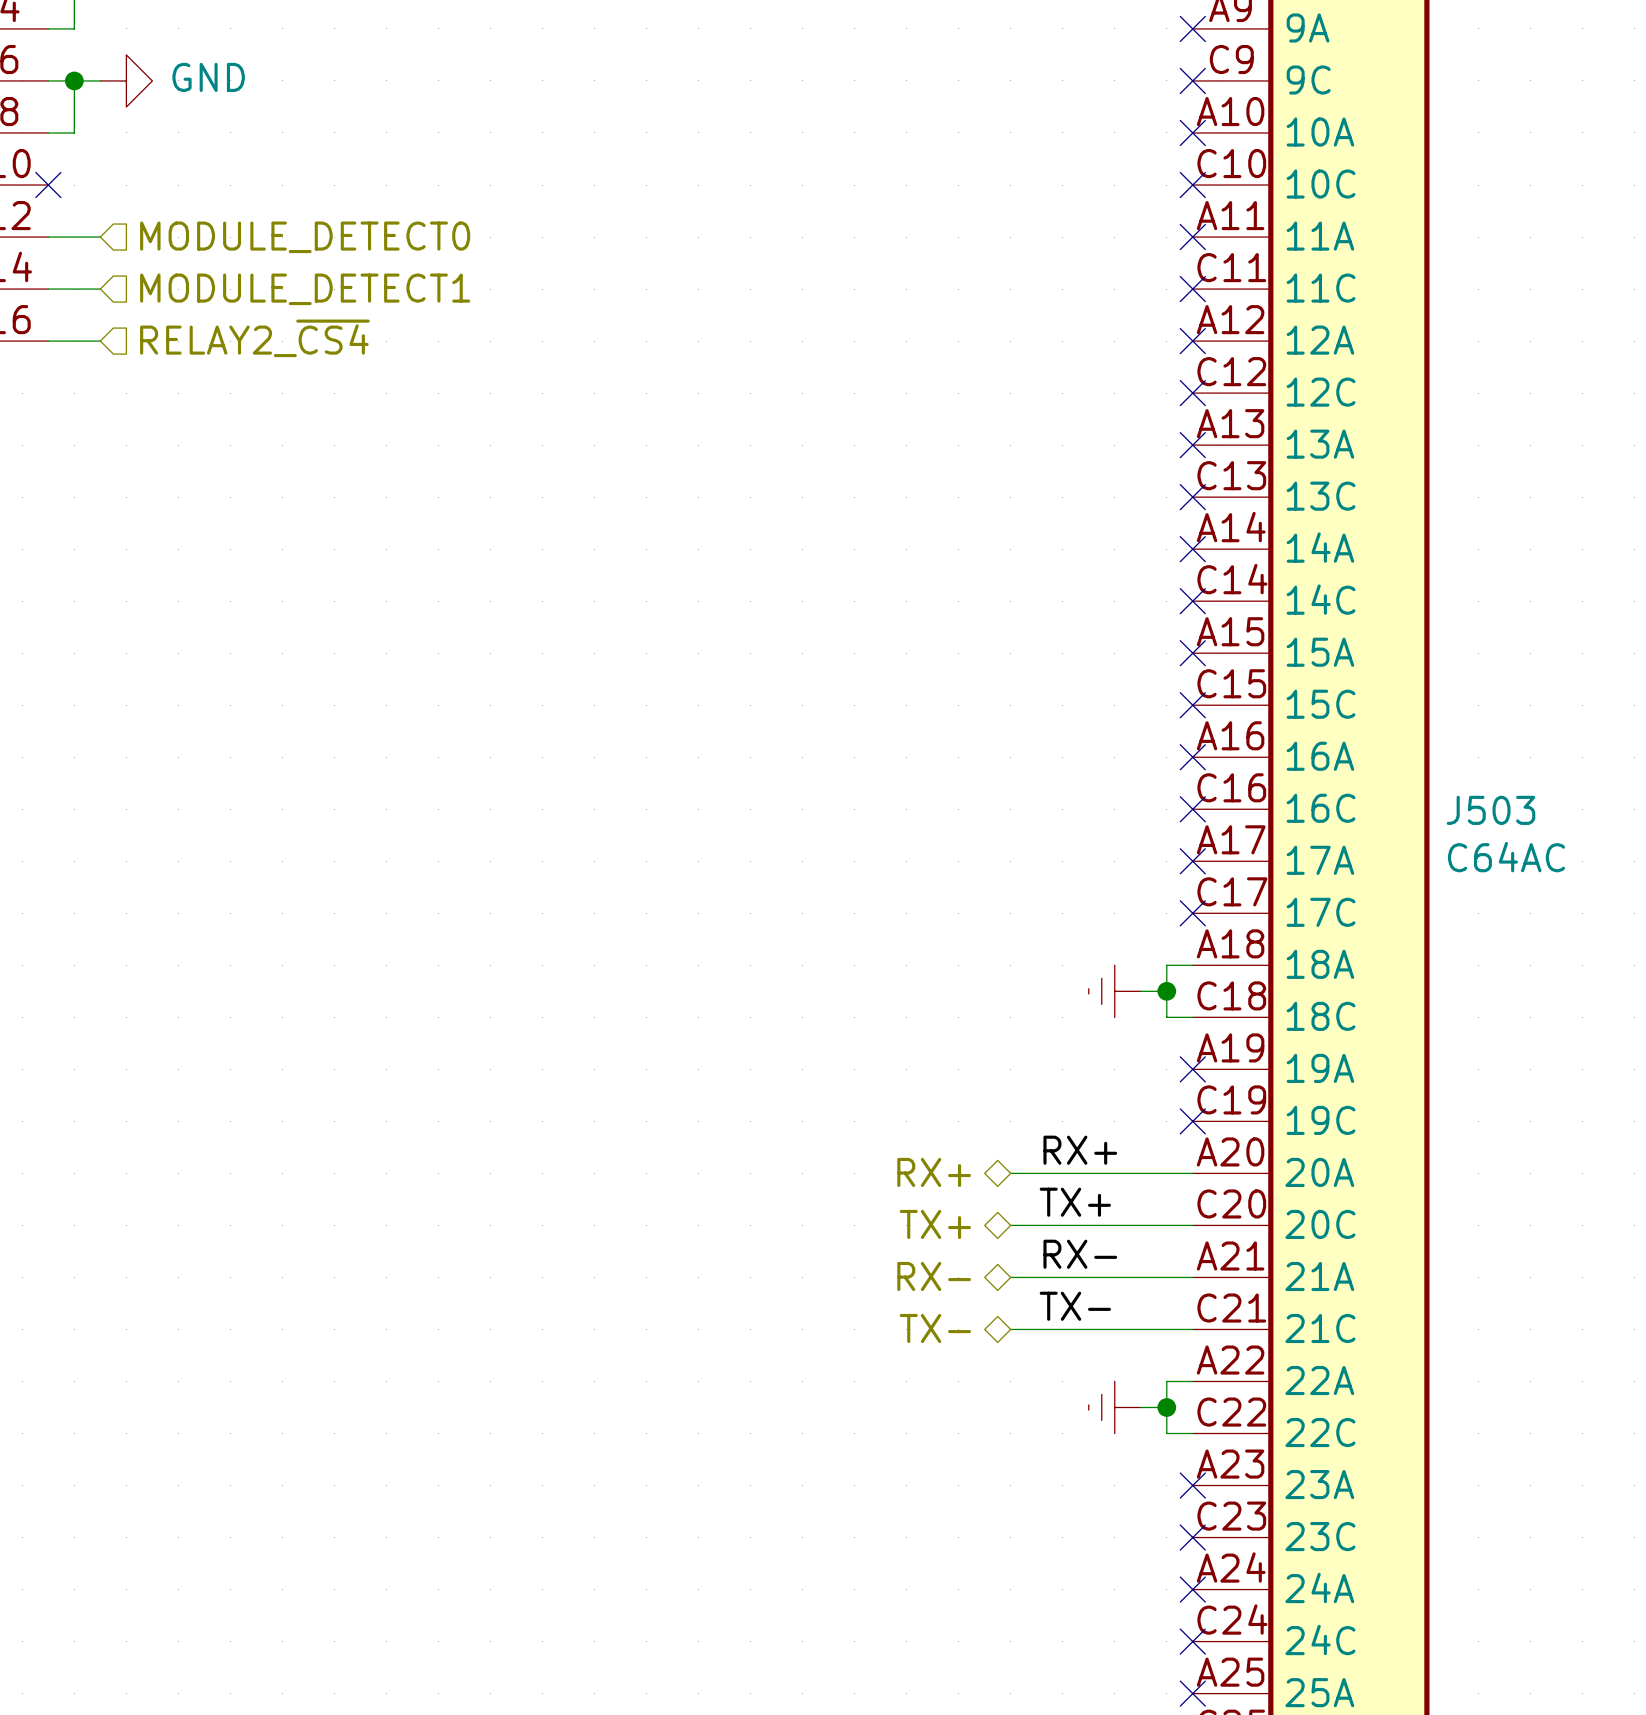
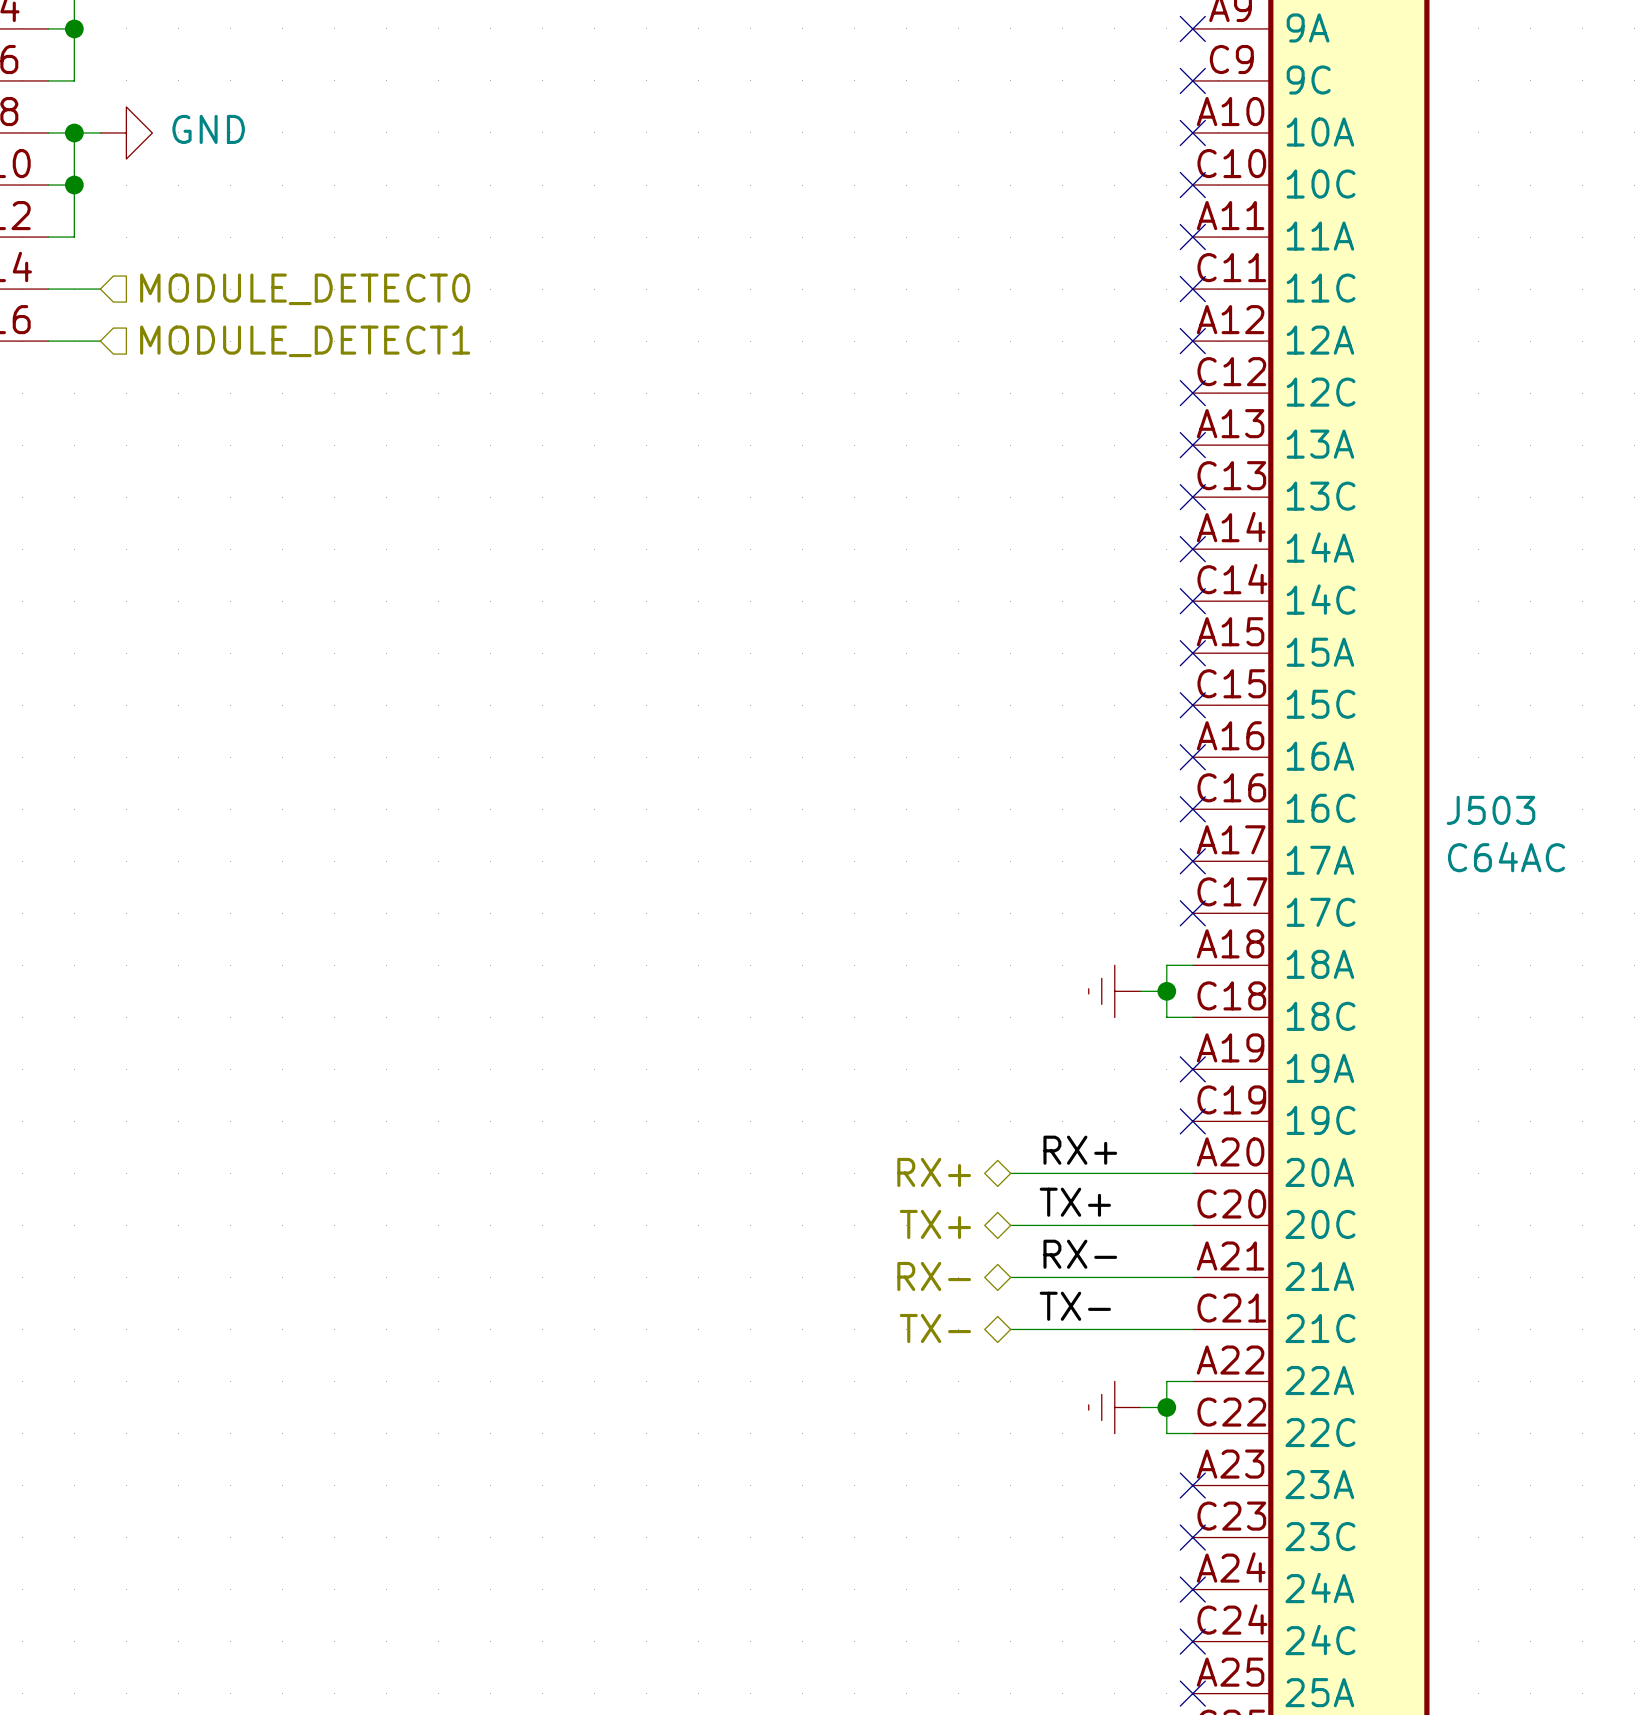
wire: none -> (74, 28) (74, 80)
junction: none -> (74, 28)
junction: (74, 80) -> none
wire: (100, 80) (74, 80) (74, 132) -> none
power symbol position: GND (126, 80) -> GND (126, 132)
junction: none -> (74, 132)
wire: none -> (48, 185) (74, 185)
no-connect mark: (48, 185) -> none
junction: none -> (74, 185)
wire: (74, 237) (100, 237) -> (74, 237) (74, 132) (100, 132)
hierarchical label: MODULE_DETECT0 (305, 237) -> none
hierarchical label: MODULE_DETECT1 (305, 289) -> MODULE_DETECT0 (305, 289)
hierarchical label: RELAY2_~{CS4} (254, 338) -> MODULE_DETECT1 (305, 341)

